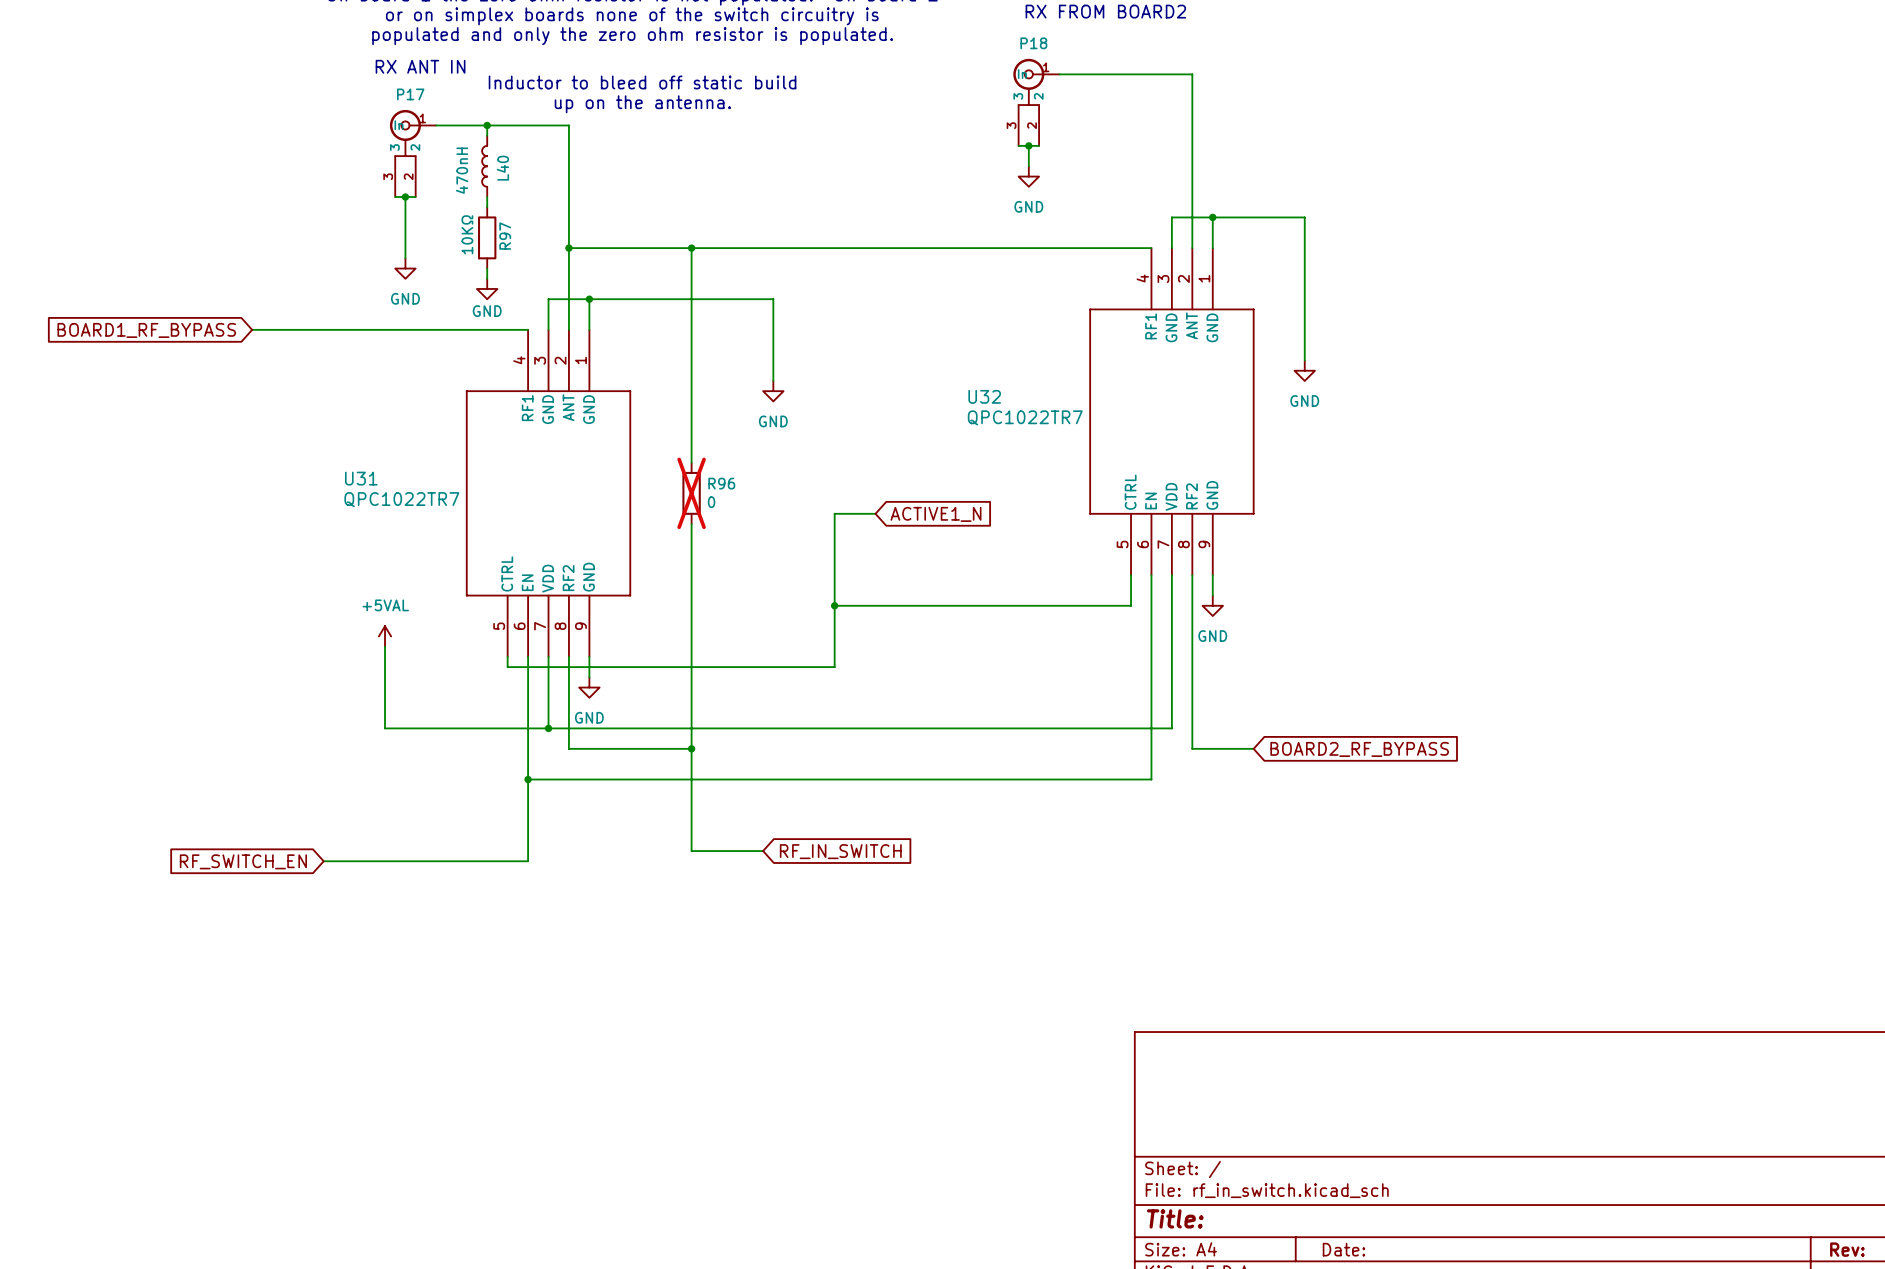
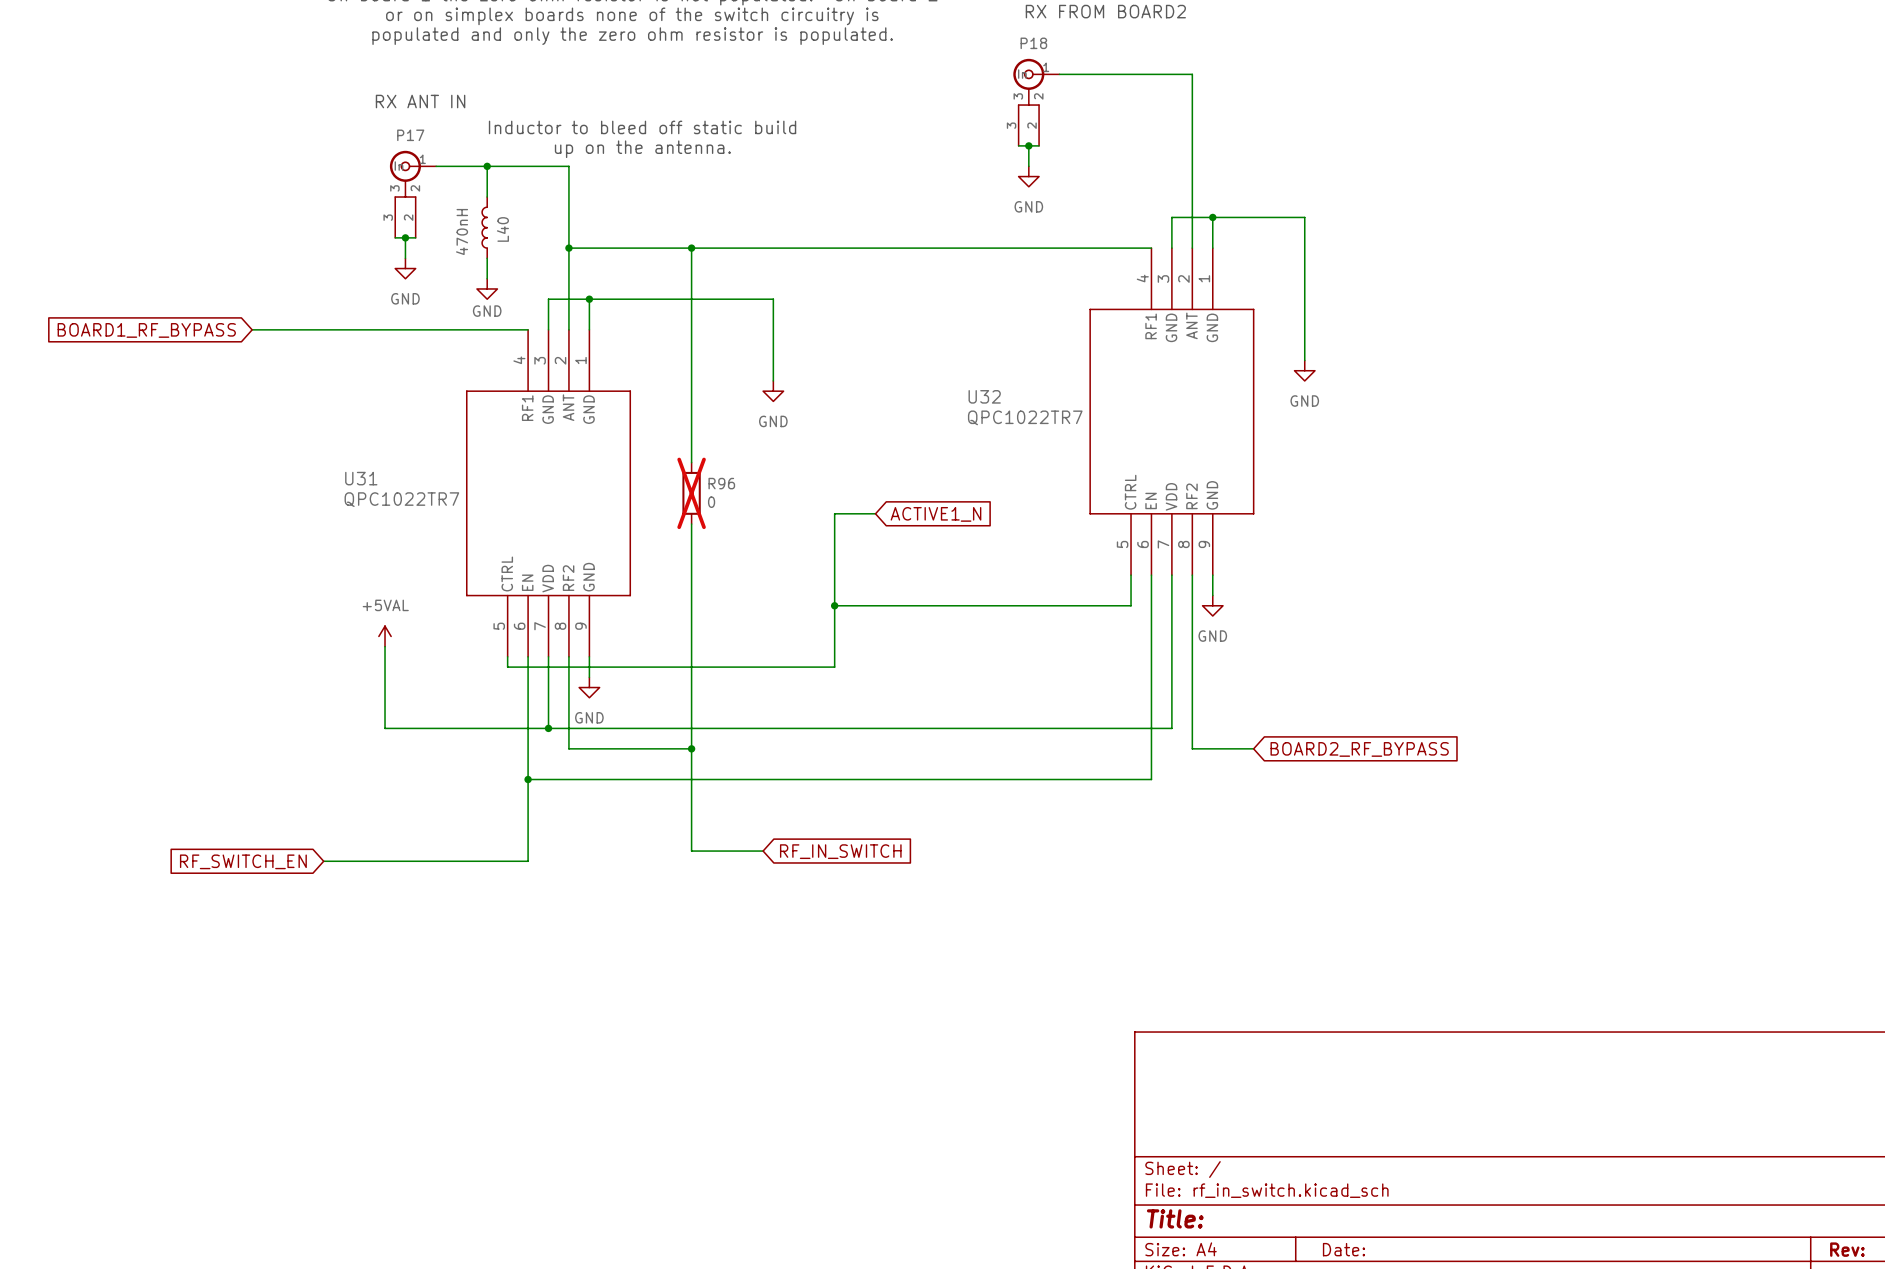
text position: RX ANT IN (420, 66) -> RX ANT IN (420, 101)
text position: Inductor to bleed off static build (642, 82) -> Inductor to bleed off static build (642, 127)
text position: up on the antenna. (642, 104) -> up on the antenna. (642, 149)
wire: (436, 125) (568, 125) (568, 166) -> (436, 166) (568, 166)
junction position: (487, 125) -> (487, 166)
P17 position: (413, 153) -> (413, 194)
L40 position: (484, 166) -> (484, 227)
wire: (405, 197) (405, 237) -> none
junction position: (405, 197) -> (405, 237)
R97: 10KΩ (487, 237) -> none

